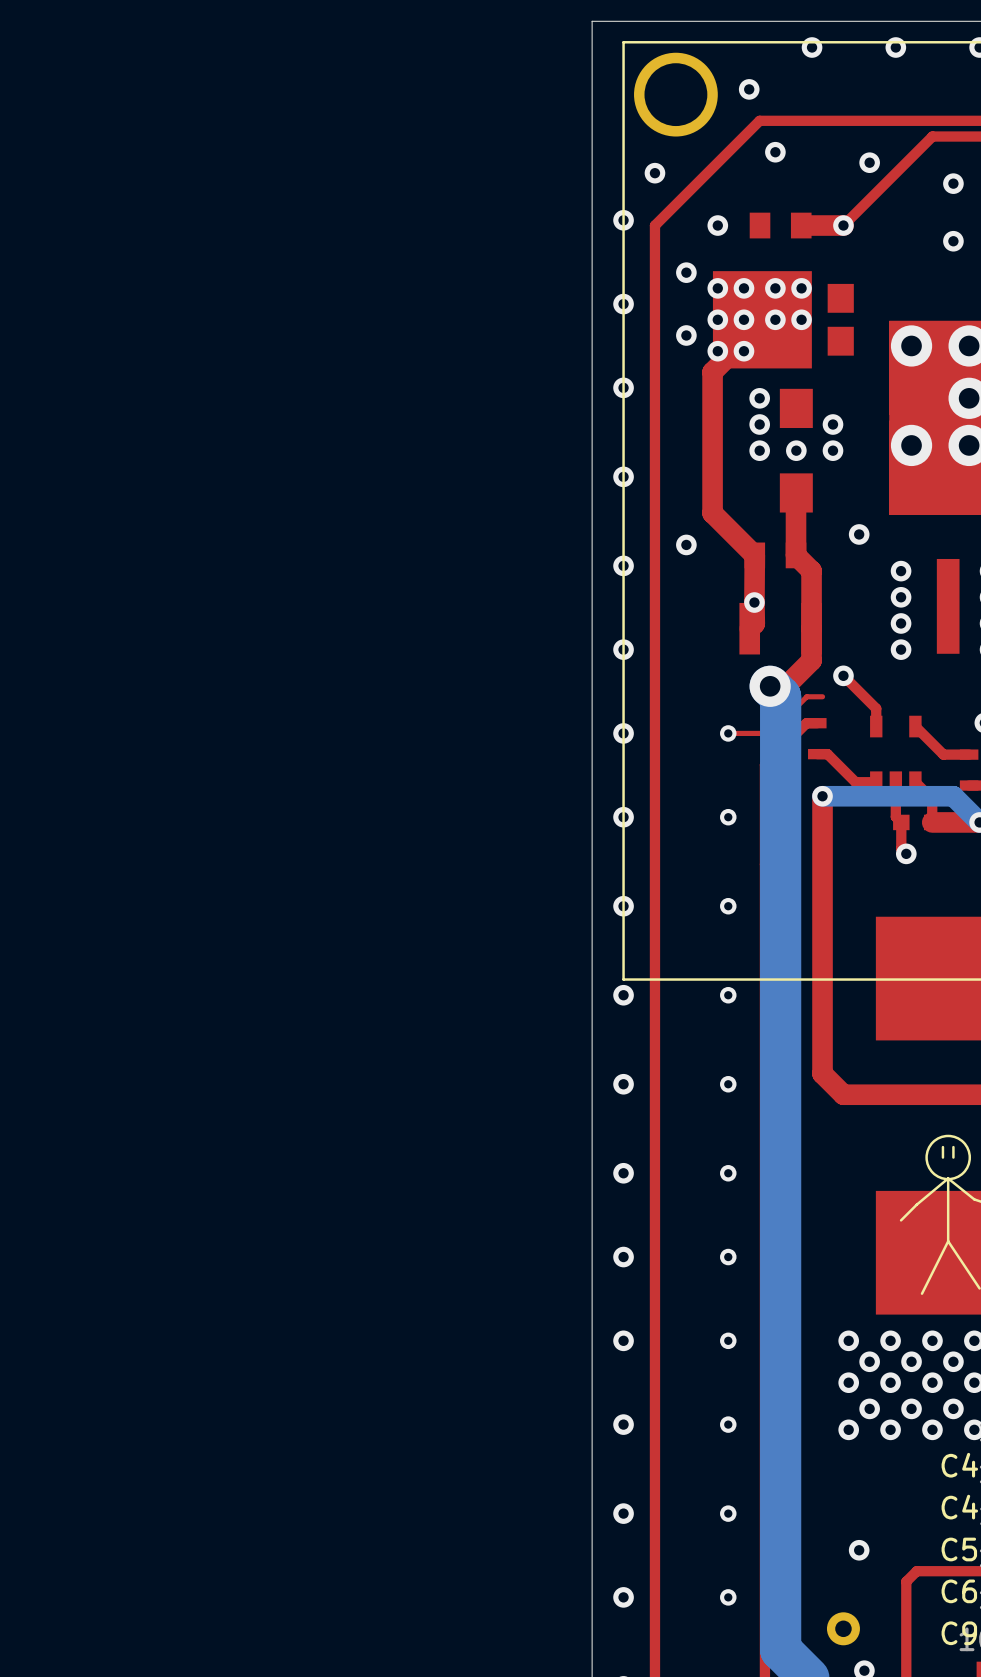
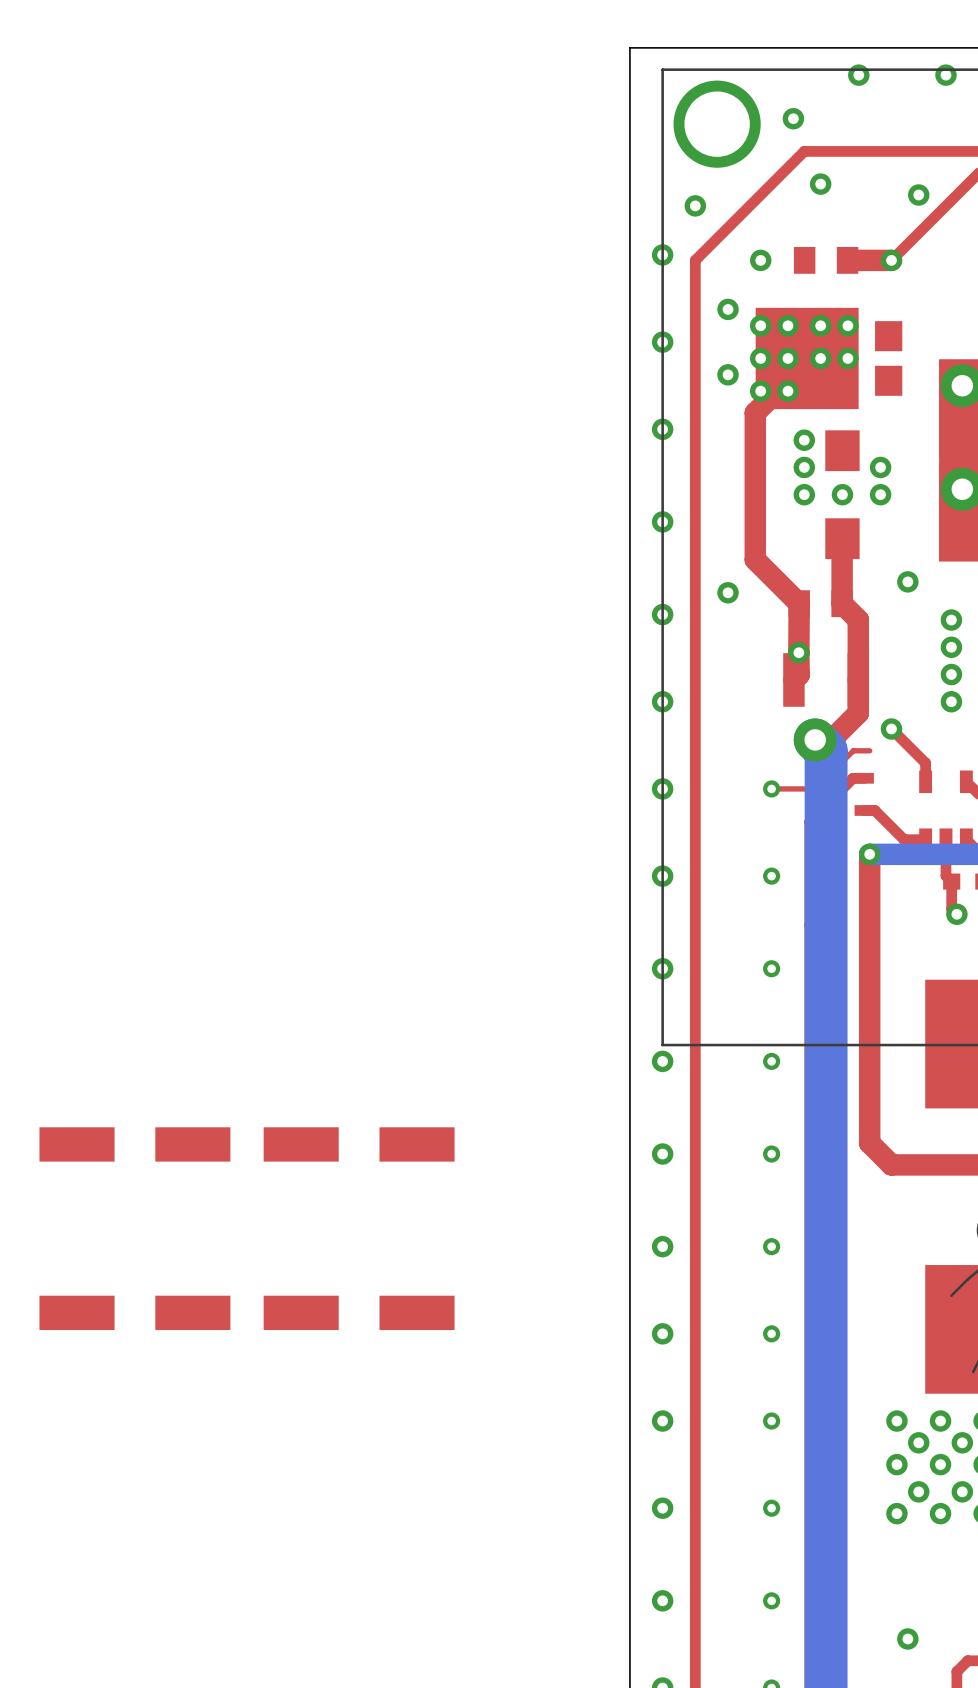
part: none -> (134, 1144)
part: none -> (359, 1144)
part: none -> (134, 1312)
part: none -> (359, 1312)

